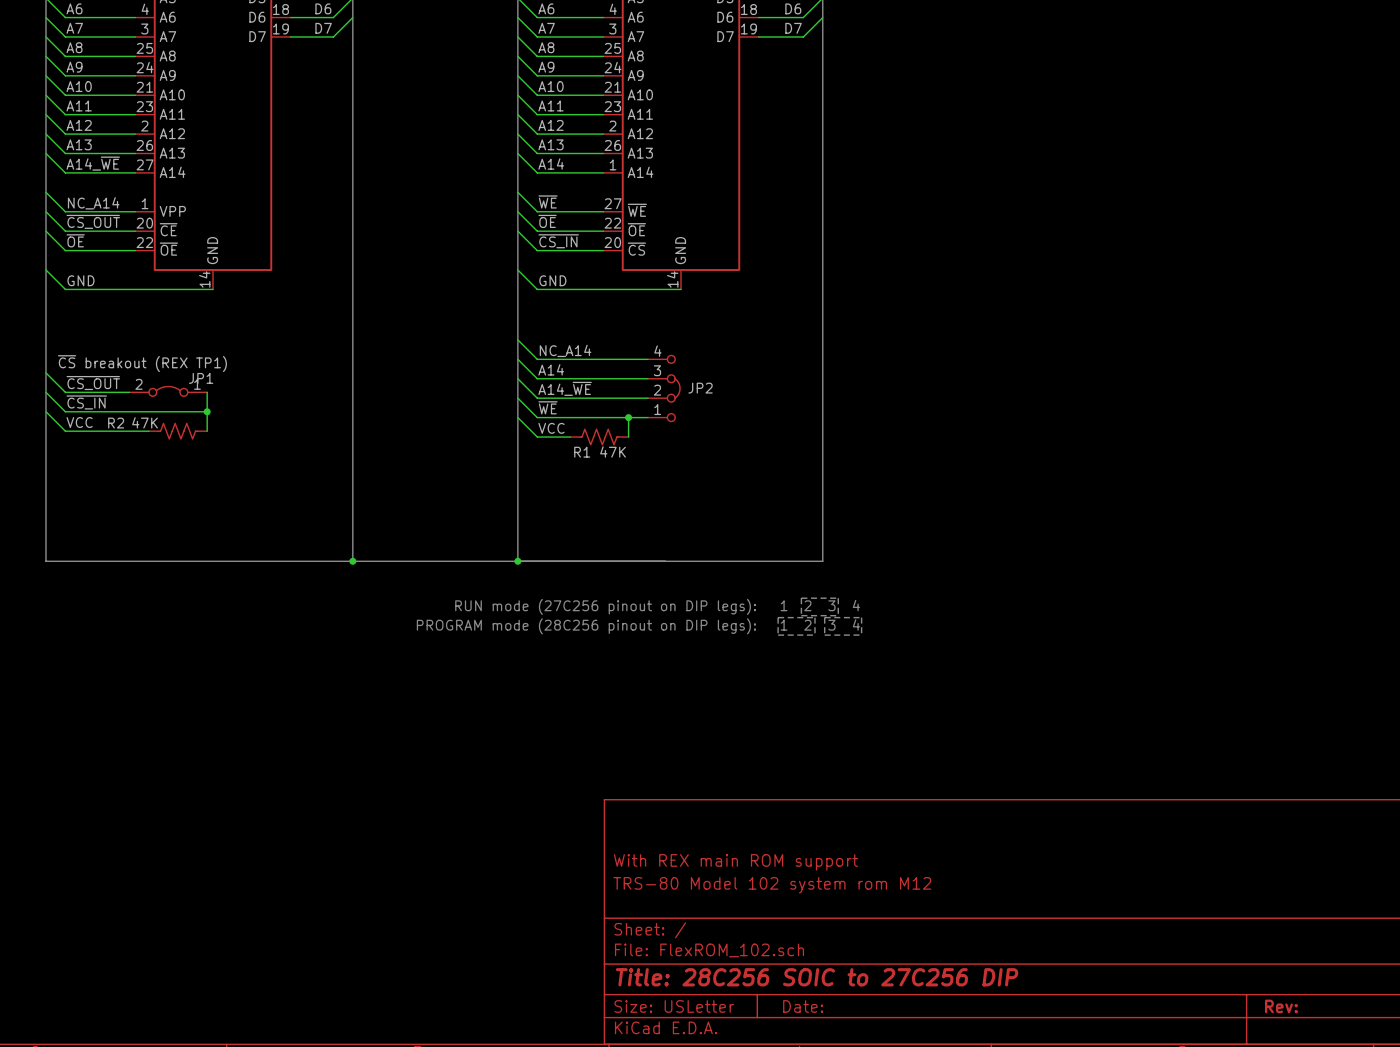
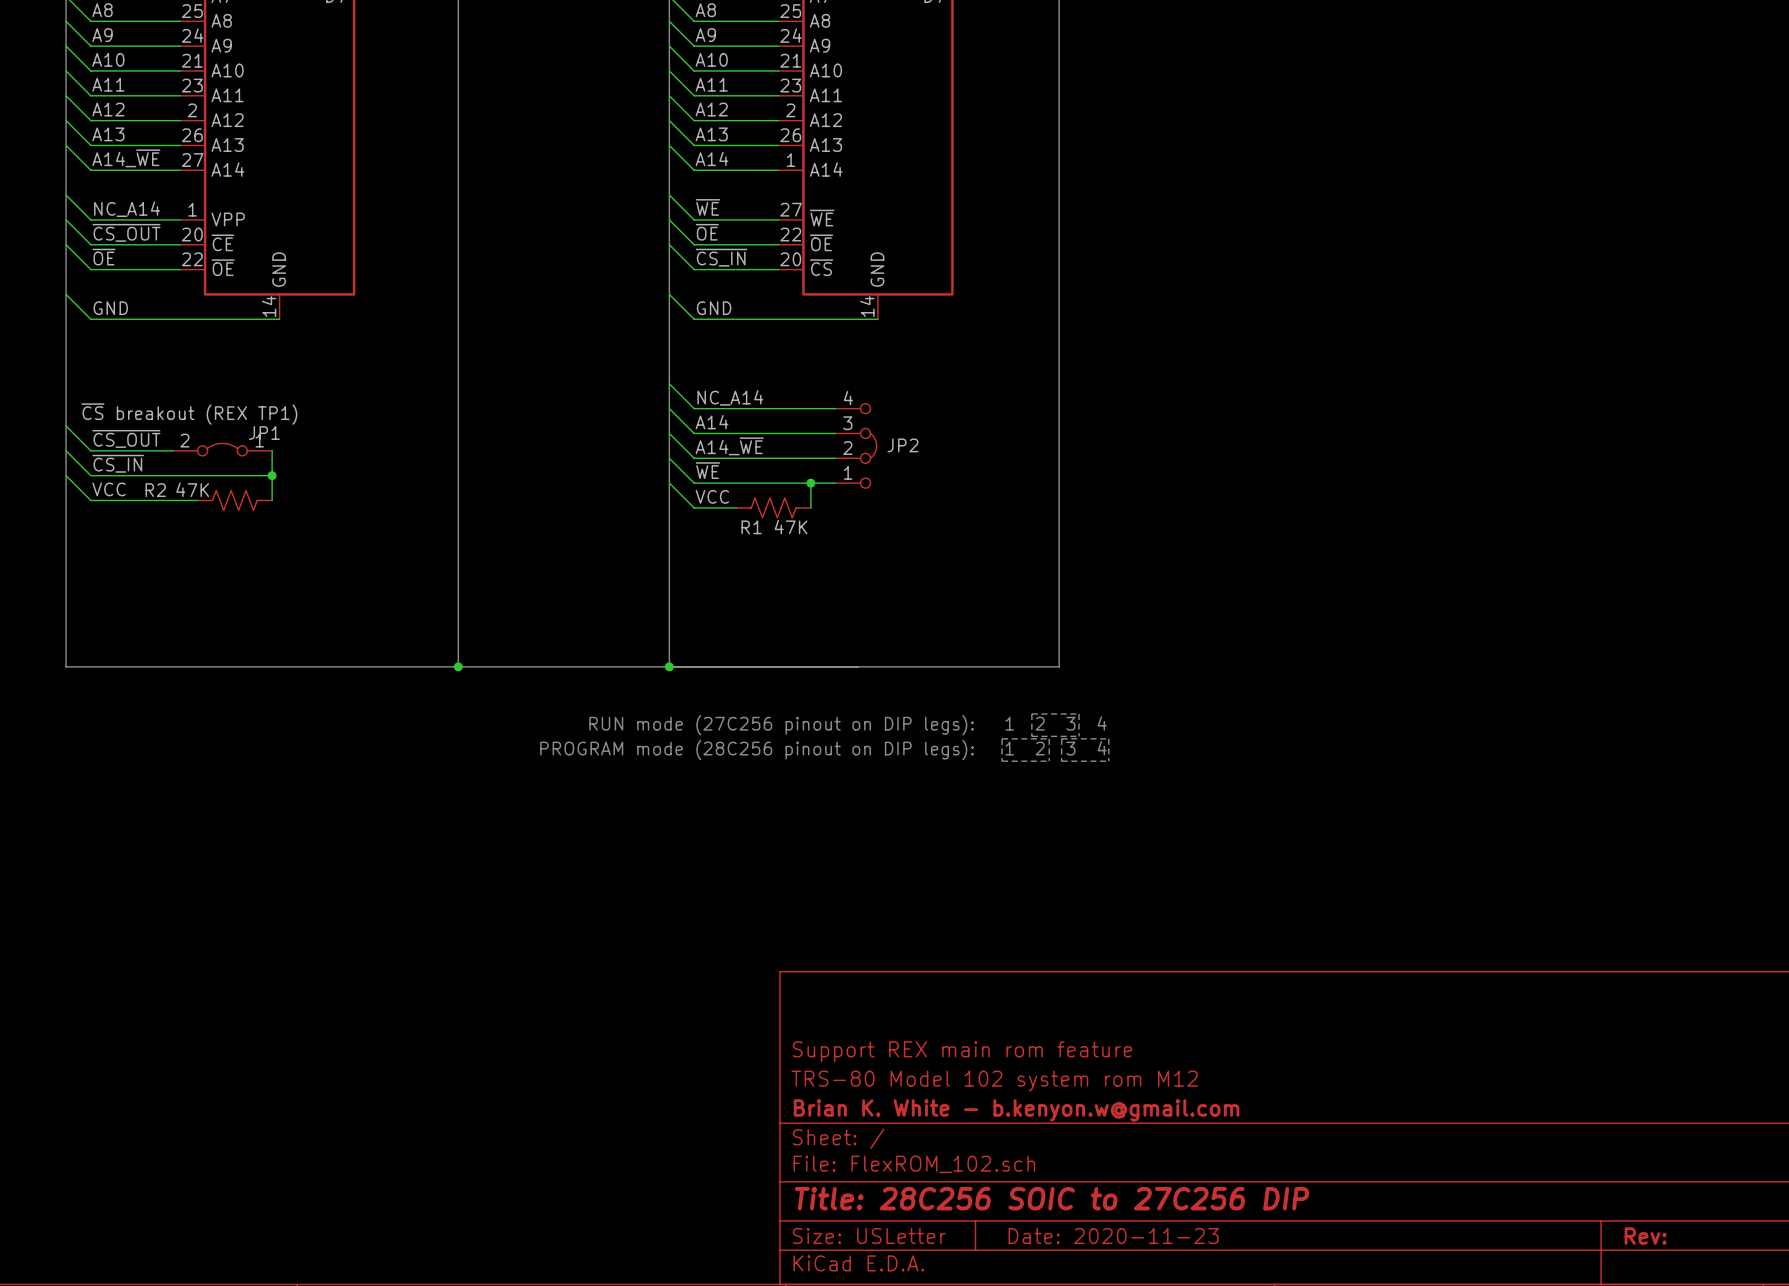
title block: With REX main ROM support (735, 862) -> Support REX main rom feature (962, 1051)
title block: none -> Brian K. White - b.kenyon.w@gmail.com (1016, 1110)
title block: Date: (803, 1006) -> Date: 2020-11-23 (1113, 1236)

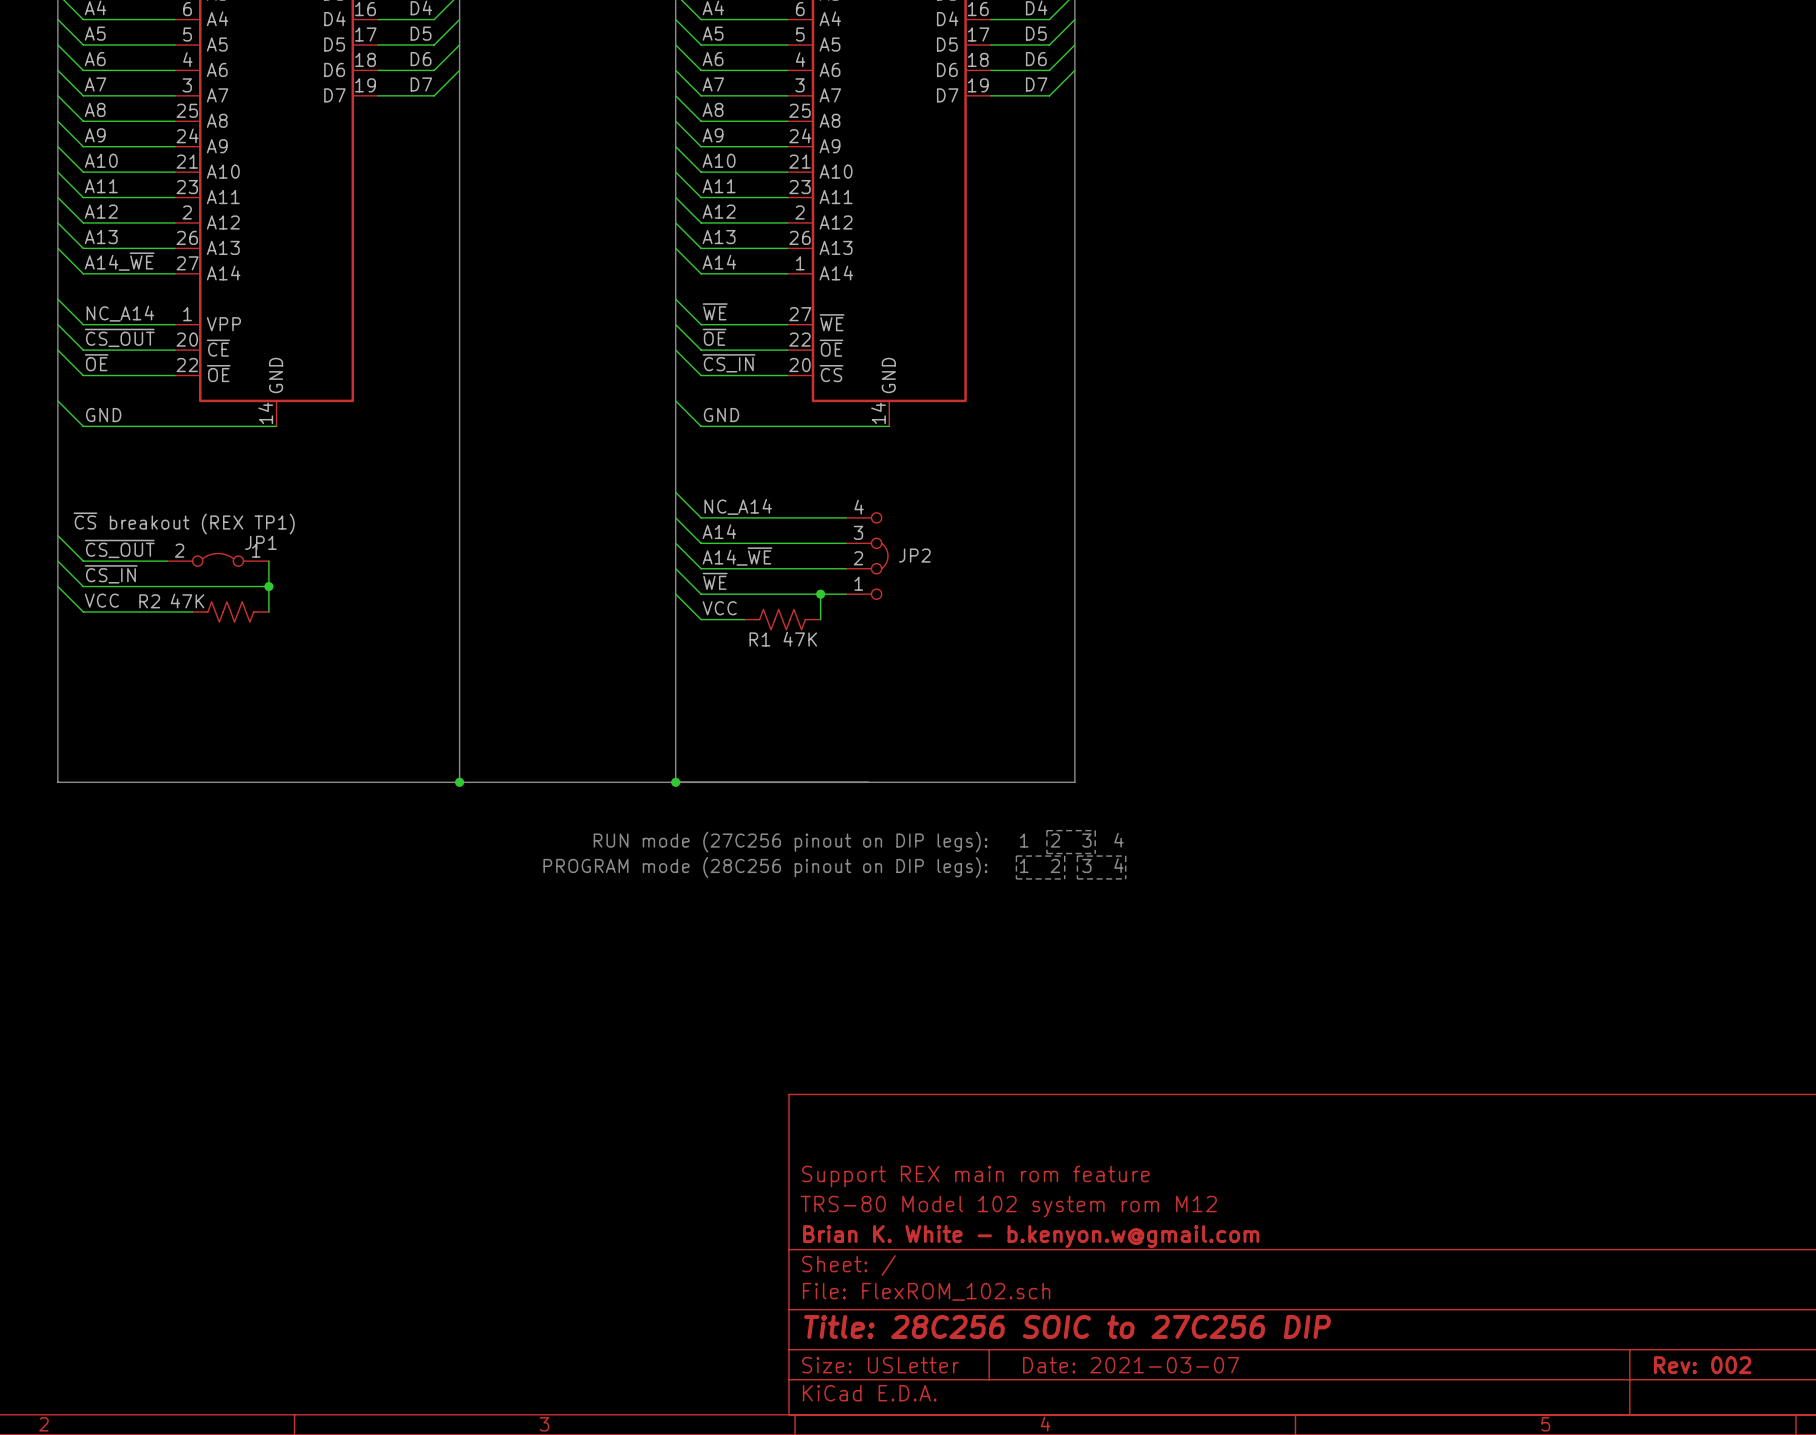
title block: Date: 2020-11-23 (1113, 1236) -> Date: 2021-03-07 (1131, 1365)
title block: Rev: (1645, 1236) -> Rev: 002 (1702, 1365)

